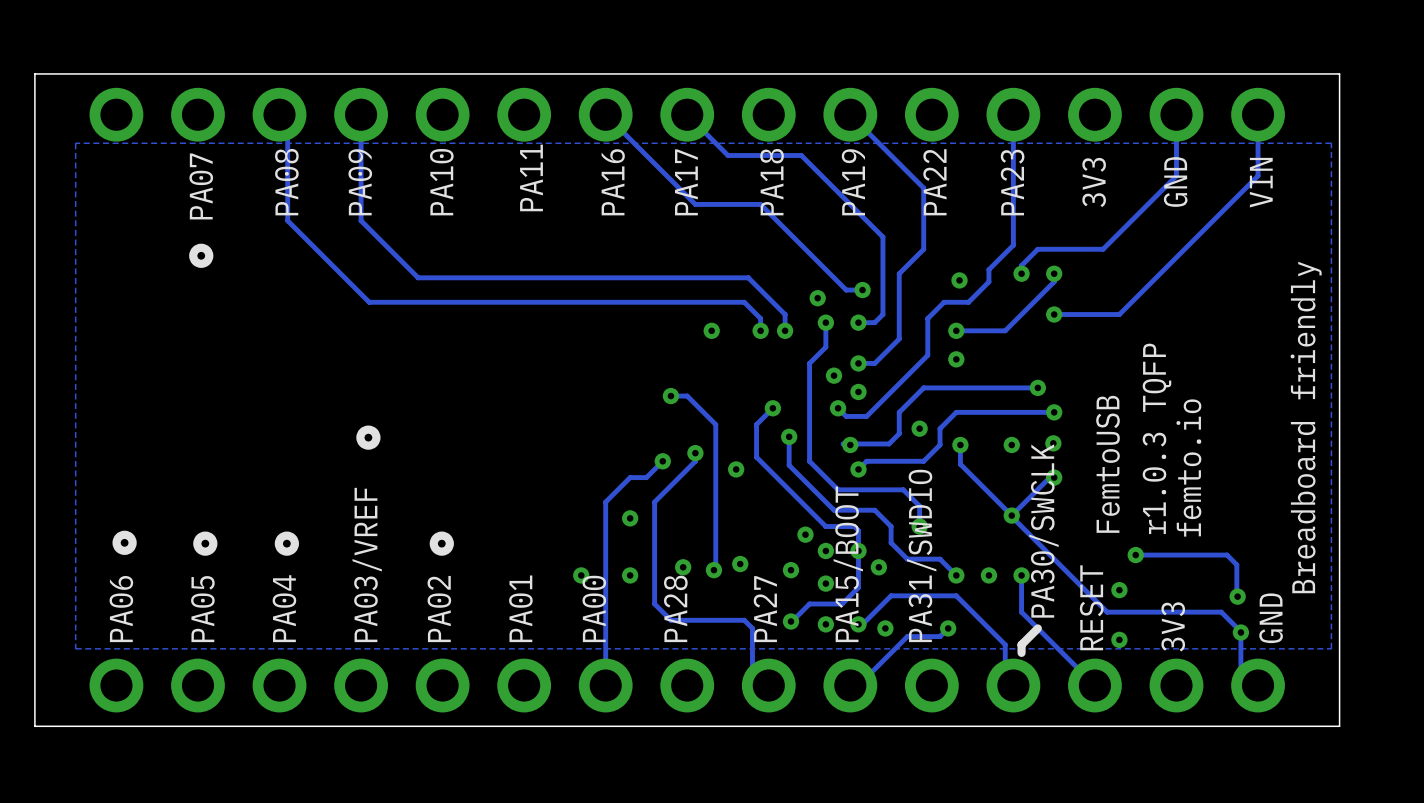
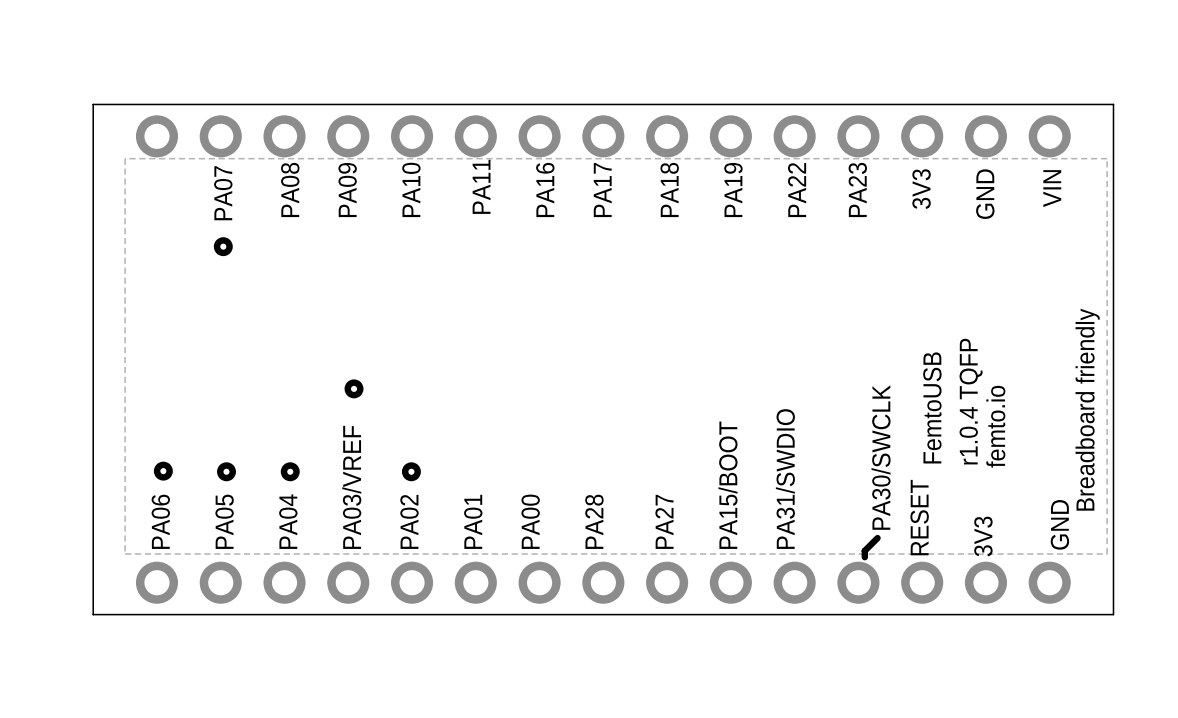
track: (279, 114) (287, 122) (287, 220) (369, 302) (744, 302) (760, 318) (760, 330) -> none
track: (361, 114) (361, 220) (418, 277) (748, 277) (785, 314) (785, 330) -> none
track: (605, 114) (695, 204) (760, 204) (846, 290) (862, 290) -> none
track: (687, 114) (728, 155) (801, 155) (882, 237) (882, 314) (874, 322) (858, 322) -> none
track: (850, 114) (923, 188) (923, 249) (899, 273) (899, 338) (874, 363) (858, 363) -> none
track: (1013, 114) (1013, 245) (988, 269) (988, 281) (968, 302) (944, 302) (927, 318) (927, 355) (866, 416) (846, 416) (838, 408) -> none
track: (1176, 114) (1176, 175) (1103, 249) (1037, 249) (1021, 265) (1021, 273) -> none
track: (1258, 114) (1258, 175) (1119, 314) (1054, 314) -> none
via: (1021, 273) -> none
track: (1054, 273) (1054, 281) (1005, 330) (956, 330) -> none
via: (1054, 273) -> none
via: (959, 280) -> none
via: (862, 290) -> none
via: (817, 298) -> none
via: (1054, 314) -> none
track: (825, 322) (825, 347) (809, 363) (809, 461) (838, 489) (903, 489) (919, 506) (919, 526) -> none
via: (825, 322) -> none
via: (858, 322) -> none
via: (711, 330) -> none
via: (760, 330) -> none
via: (785, 330) -> none
via: (956, 330) -> none
via: (956, 359) -> none
via: (858, 363) -> none
via: (834, 375) -> none
track: (1037, 387) (923, 387) (899, 412) (899, 433) (889, 443) (843, 443) (850, 444) -> none
via: (1037, 387) -> none
via: (858, 391) -> none
track: (670, 396) (687, 396) (715, 424) (715, 568) (713, 570) -> none
via: (670, 396) -> none
track: (772, 408) (756, 424) (756, 457) (825, 526) (854, 526) (858, 530) (858, 587) (842, 603) (809, 603) (791, 621) -> none
via: (772, 408) -> none
via: (838, 408) -> none
track: (1054, 412) (956, 412) (940, 428) (940, 444) (923, 461) (866, 461) (858, 469) -> none
via: (1054, 412) -> none
via: (919, 428) -> none
track: (789, 436) (789, 465) (834, 510) (874, 510) (891, 526) (891, 542) (907, 559) (940, 559) (956, 575) -> none
via: (789, 436) -> none
text: r1.0.3 TQFP (1156, 438) -> r1.0.4 TQFP (971, 401)
via: (1053, 443) -> none
via: (850, 444) -> none
track: (960, 444) (960, 464) (1011, 515) -> none
via: (960, 444) -> none
via: (1011, 444) -> none
track: (695, 453) (695, 461) (654, 502) (654, 603) (670, 620) (744, 620) (752, 628) (752, 669) (768, 685) -> none
via: (695, 453) -> none
track: (662, 461) (646, 477) (630, 477) (605, 502) (605, 685) -> none
via: (662, 461) -> none
via: (736, 469) -> none
via: (858, 469) -> none
track: (1054, 476) (1049, 477) (1011, 515) -> none
via: (1054, 477) -> none
track: (1011, 515) (1107, 612) (1221, 612) (1240, 631) (1240, 668) (1258, 685) -> none
via: (1011, 515) -> none
via: (630, 518) -> none
via: (919, 526) -> none
via: (805, 534) -> none
via: (825, 550) -> none
via: (858, 550) -> none
track: (1135, 555) (1227, 555) (1236, 564) (1237, 596) -> none
via: (1135, 555) -> none
via: (740, 564) -> none
via: (683, 567) -> none
via: (878, 567) -> none
via: (713, 570) -> none
via: (791, 570) -> none
via: (581, 575) -> none
via: (630, 575) -> none
via: (956, 575) -> none
via: (988, 575) -> none
track: (1021, 575) (1021, 612) (1094, 685) -> none
via: (1021, 575) -> none
via: (825, 583) -> none
via: (1119, 590) -> none
via: (1237, 596) -> none
via: (791, 621) -> none
via: (825, 624) -> none
track: (858, 624) (862, 624) (891, 595) (956, 595) (1005, 644) (1005, 677) (1013, 685) -> none
via: (858, 624) -> none
via: (885, 628) -> none
track: (948, 628) (940, 636) (907, 636) (866, 677) (858, 677) (850, 685) -> none
via: (948, 628) -> none
via: (1240, 632) -> none
via: (1119, 639) -> none

